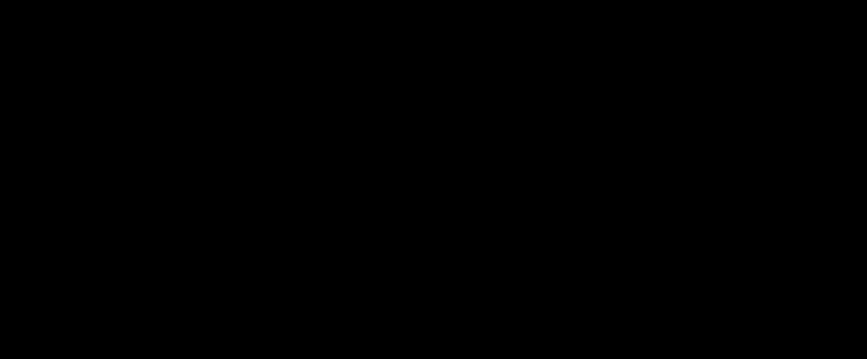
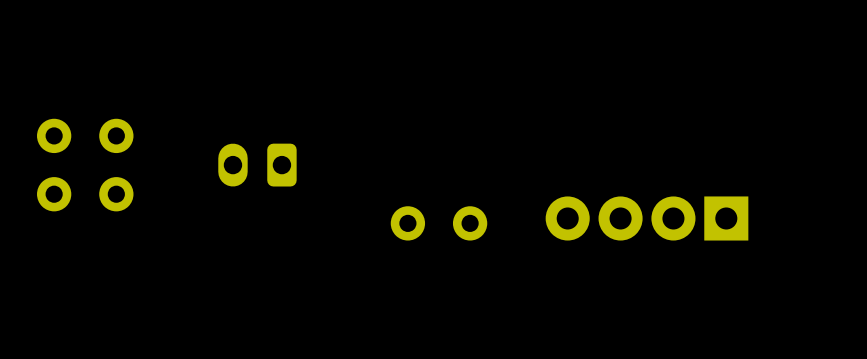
part: none -> (85, 135)
part: none -> (257, 165)
part: none -> (85, 194)
part: none -> (647, 218)
part: none -> (439, 223)

